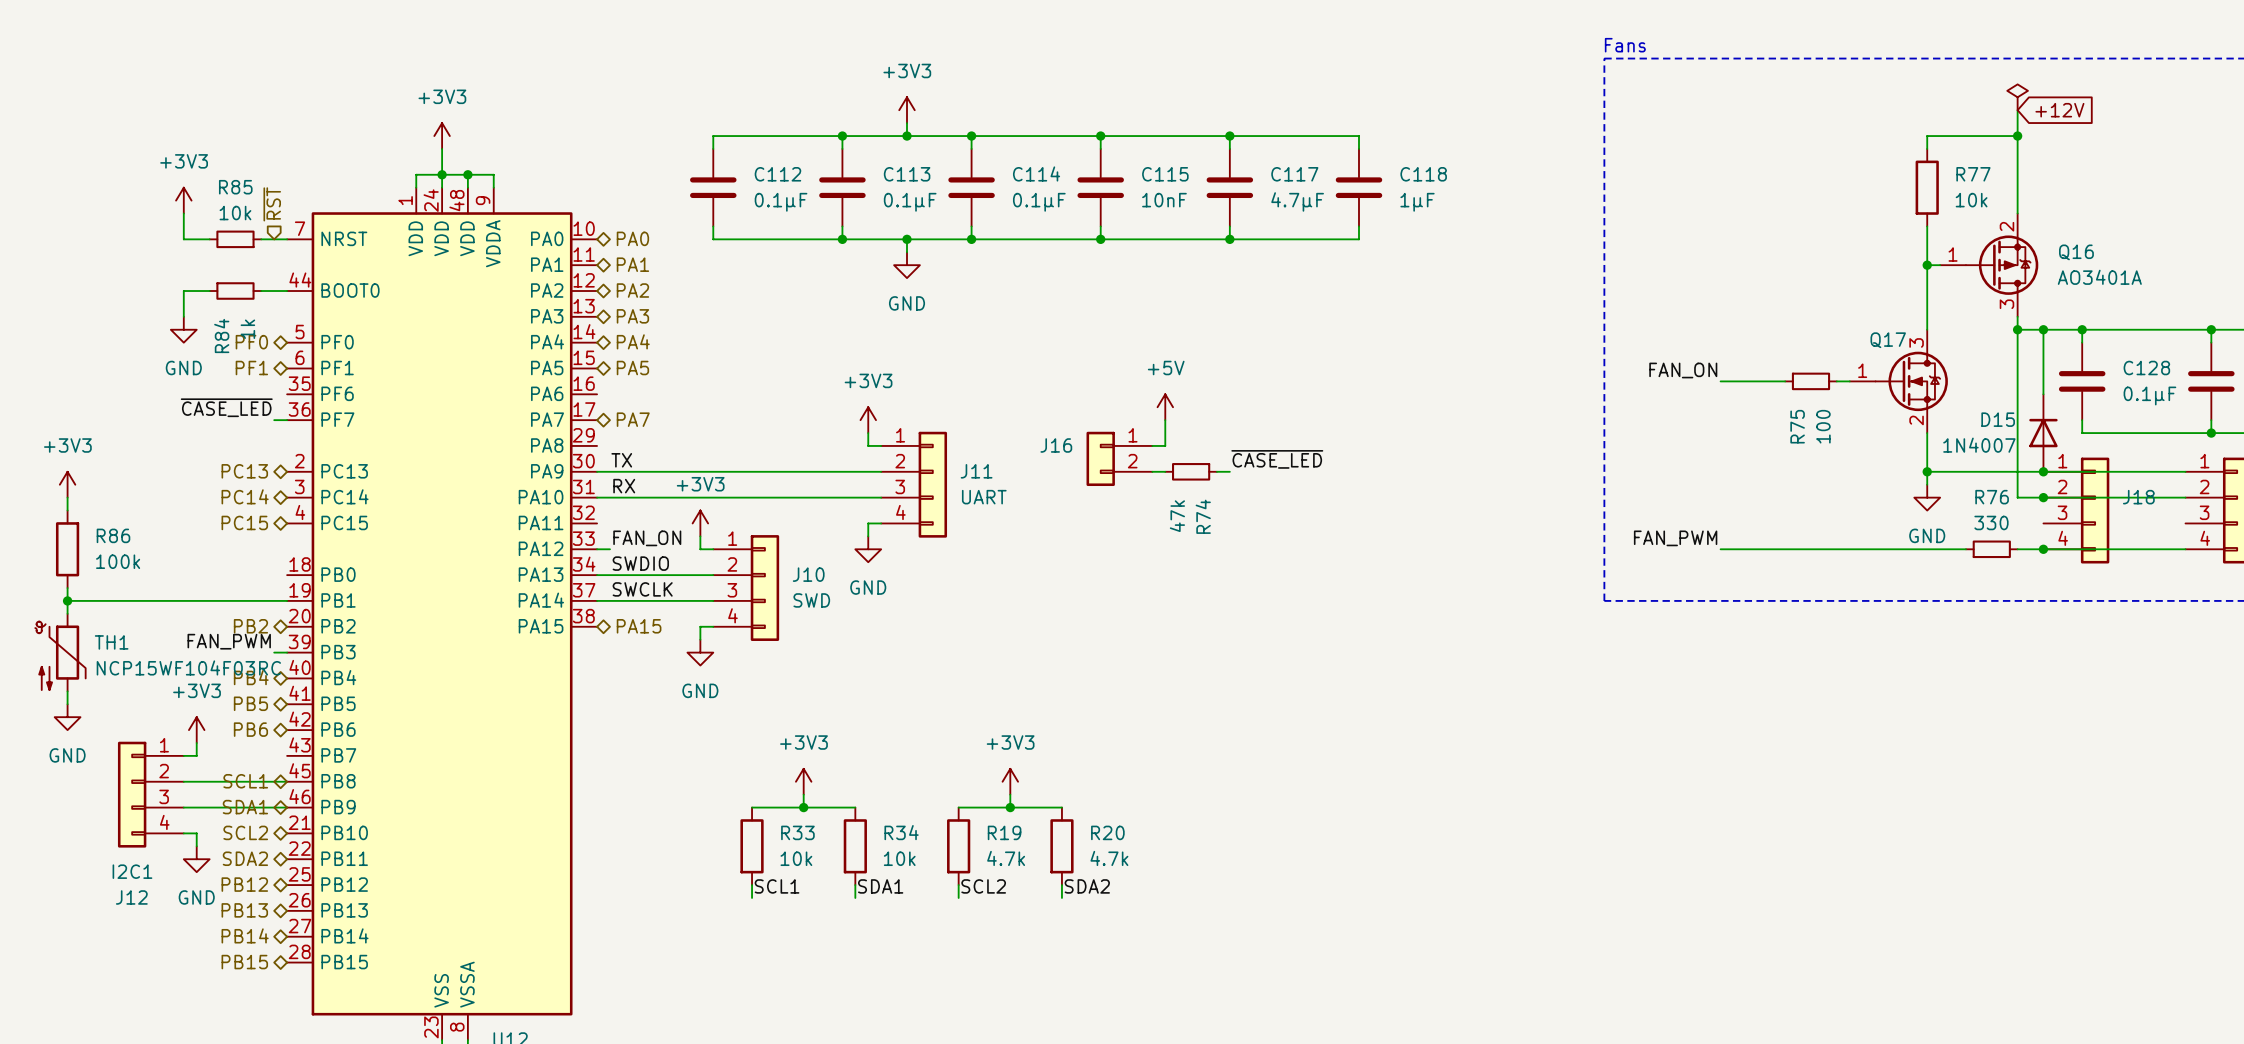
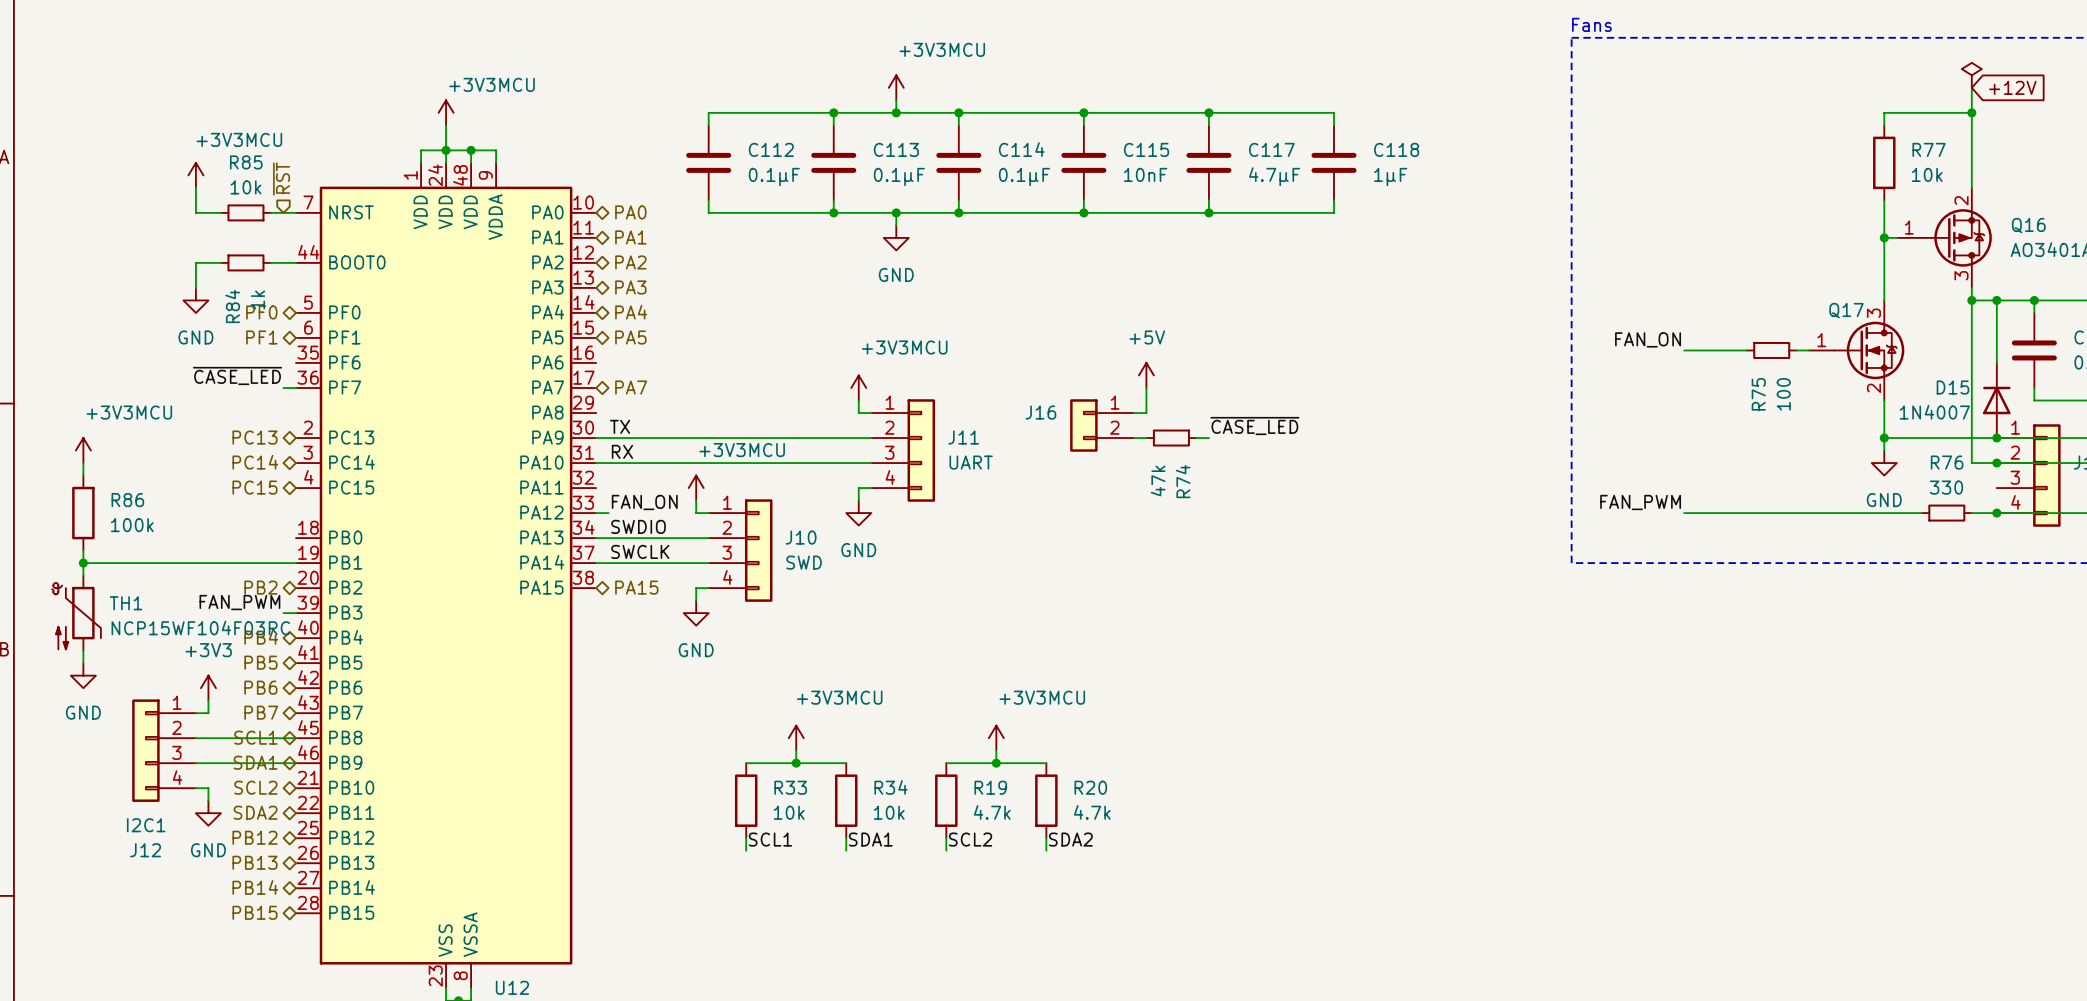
power symbol: +3V3 (907, 110) -> +3V3MCU (896, 87)
power symbol: +3V3 (442, 136) -> +3V3MCU (446, 112)
power symbol: +3V3 (183, 200) -> +3V3MCU (195, 175)
power symbol: +3V3 (868, 420) -> +3V3MCU (858, 387)
power symbol: +3V3 (67, 484) -> +3V3MCU (83, 450)
power symbol: +3V3 (700, 523) -> +3V3MCU (696, 488)
hierarchical label: none -> PB7 (261, 712)
power symbol: +3V3 (803, 781) -> +3V3MCU (796, 738)
power symbol: +3V3 (1010, 781) -> +3V3MCU (996, 738)

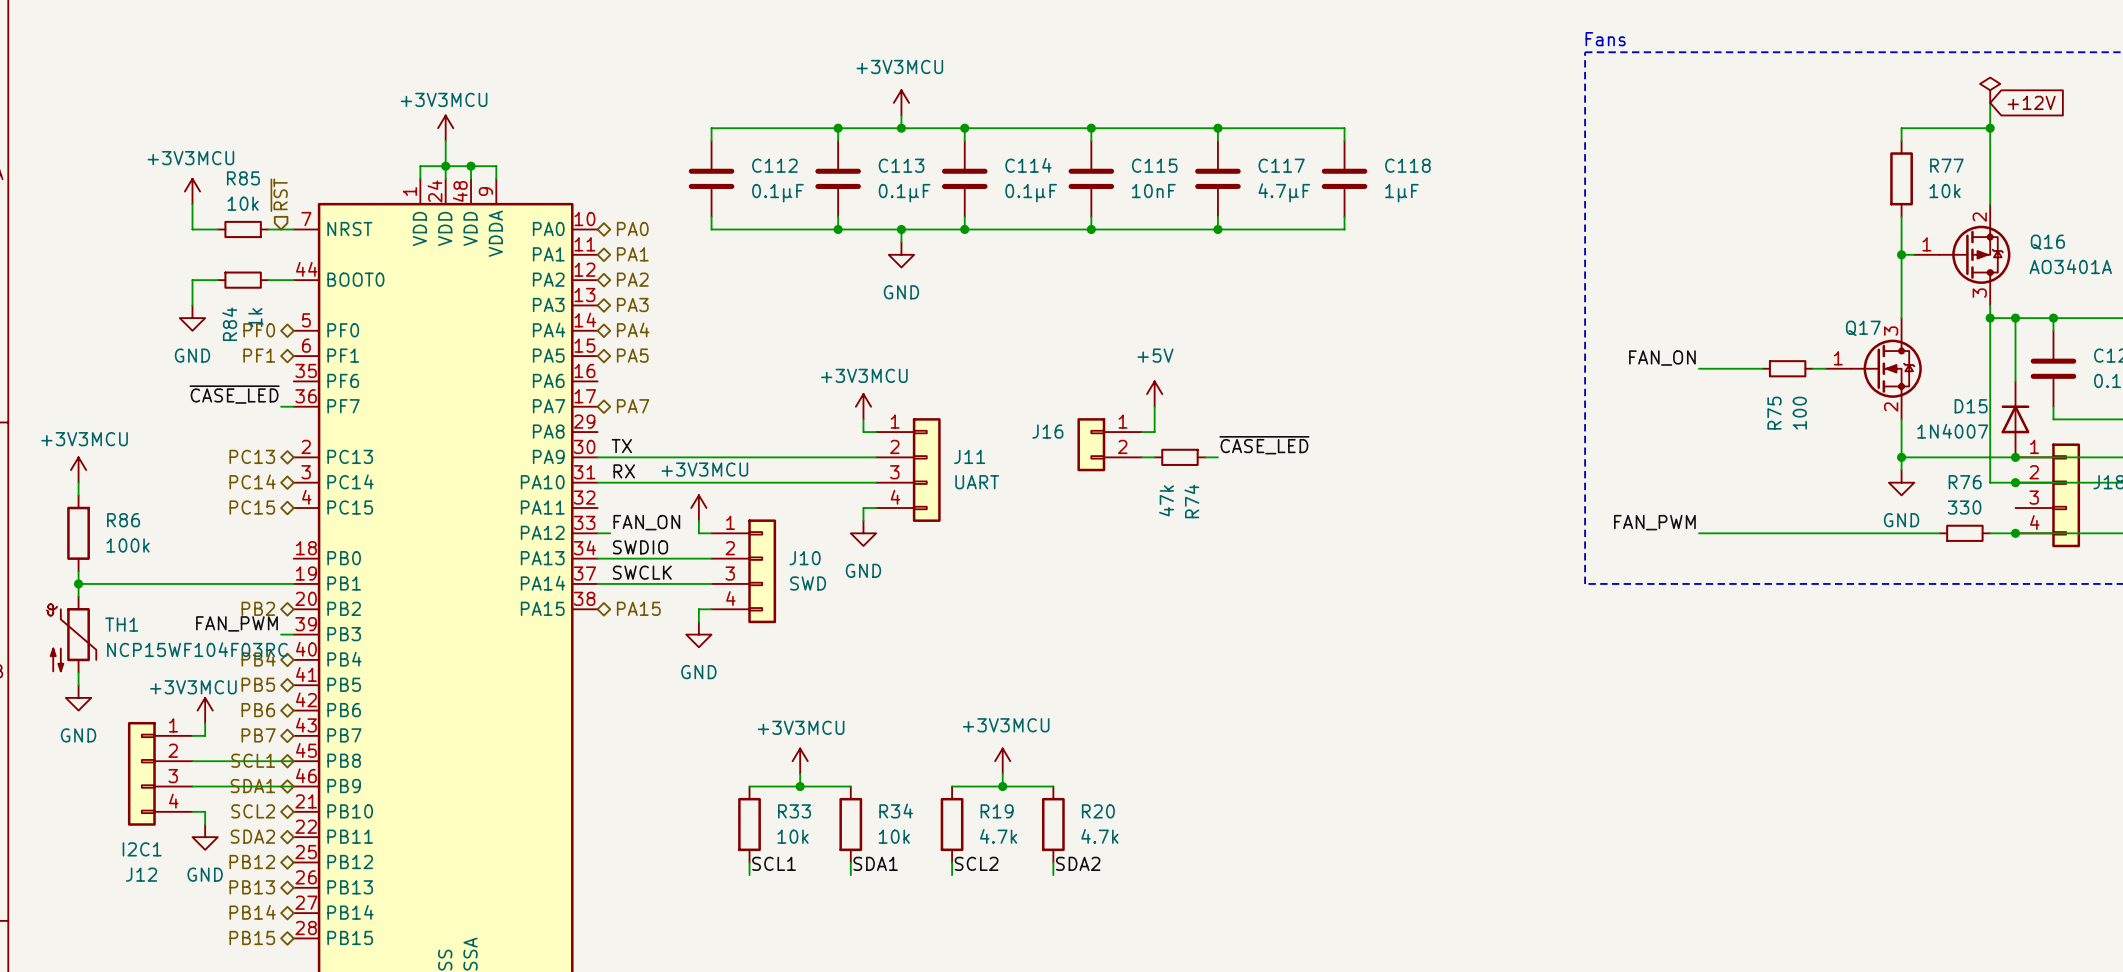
power symbol text position: +3V3MCU (942, 49) -> +3V3MCU (899, 66)
power symbol text position: +3V3MCU (492, 84) -> +3V3MCU (444, 99)
power symbol text position: +3V3MCU (239, 139) -> +3V3MCU (190, 158)
power symbol text position: +3V3MCU (904, 347) -> +3V3MCU (864, 375)
power symbol text position: +3V3MCU (129, 412) -> +3V3MCU (84, 439)
power symbol text position: +3V3MCU (742, 450) -> +3V3MCU (704, 469)
power symbol: +3V3 (208, 688) -> +3V3MCU (205, 710)
power symbol text position: +3V3MCU (839, 697) -> +3V3MCU (801, 727)
power symbol text position: +3V3MCU (1042, 697) -> +3V3MCU (1006, 725)

